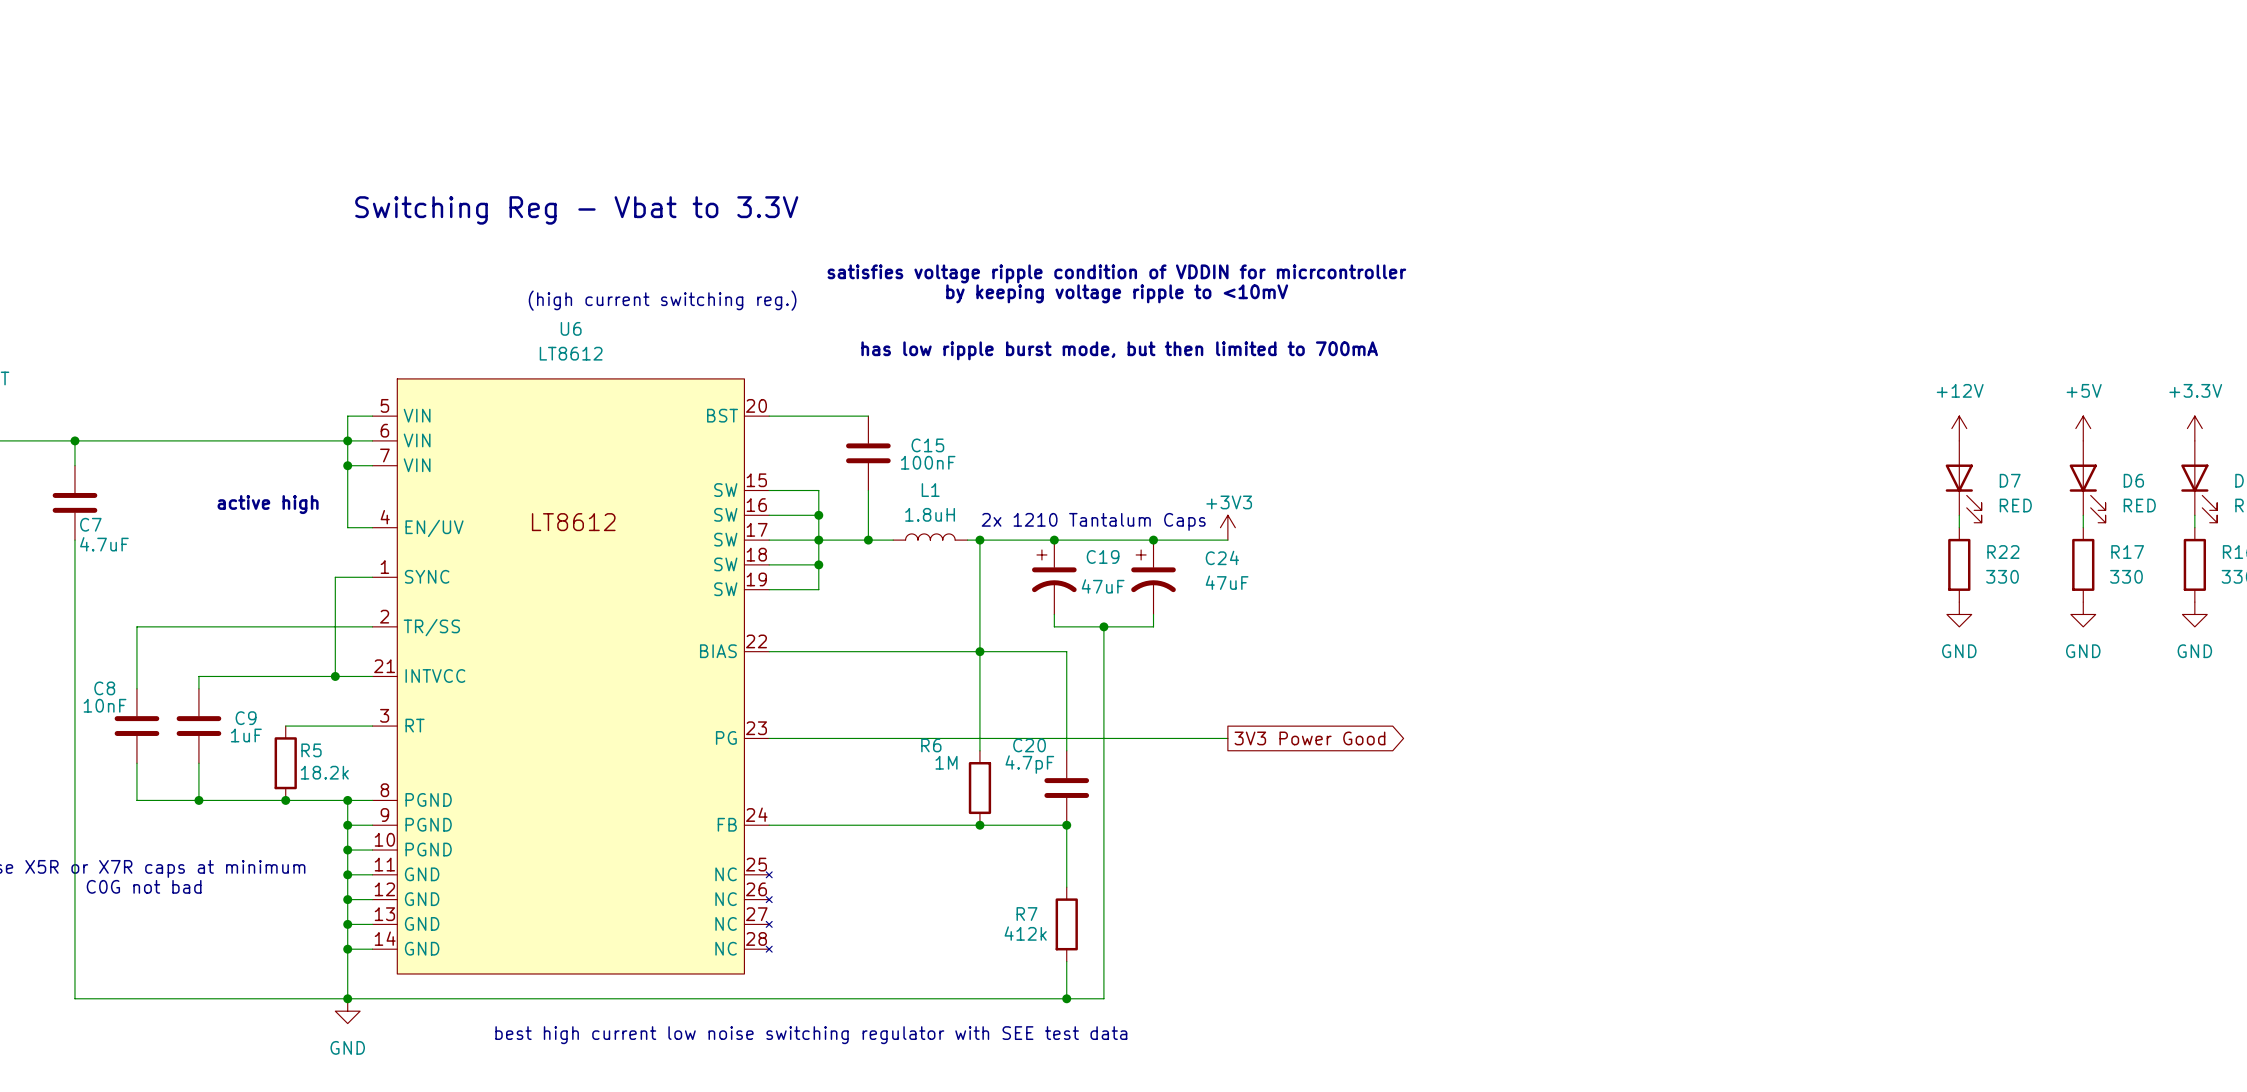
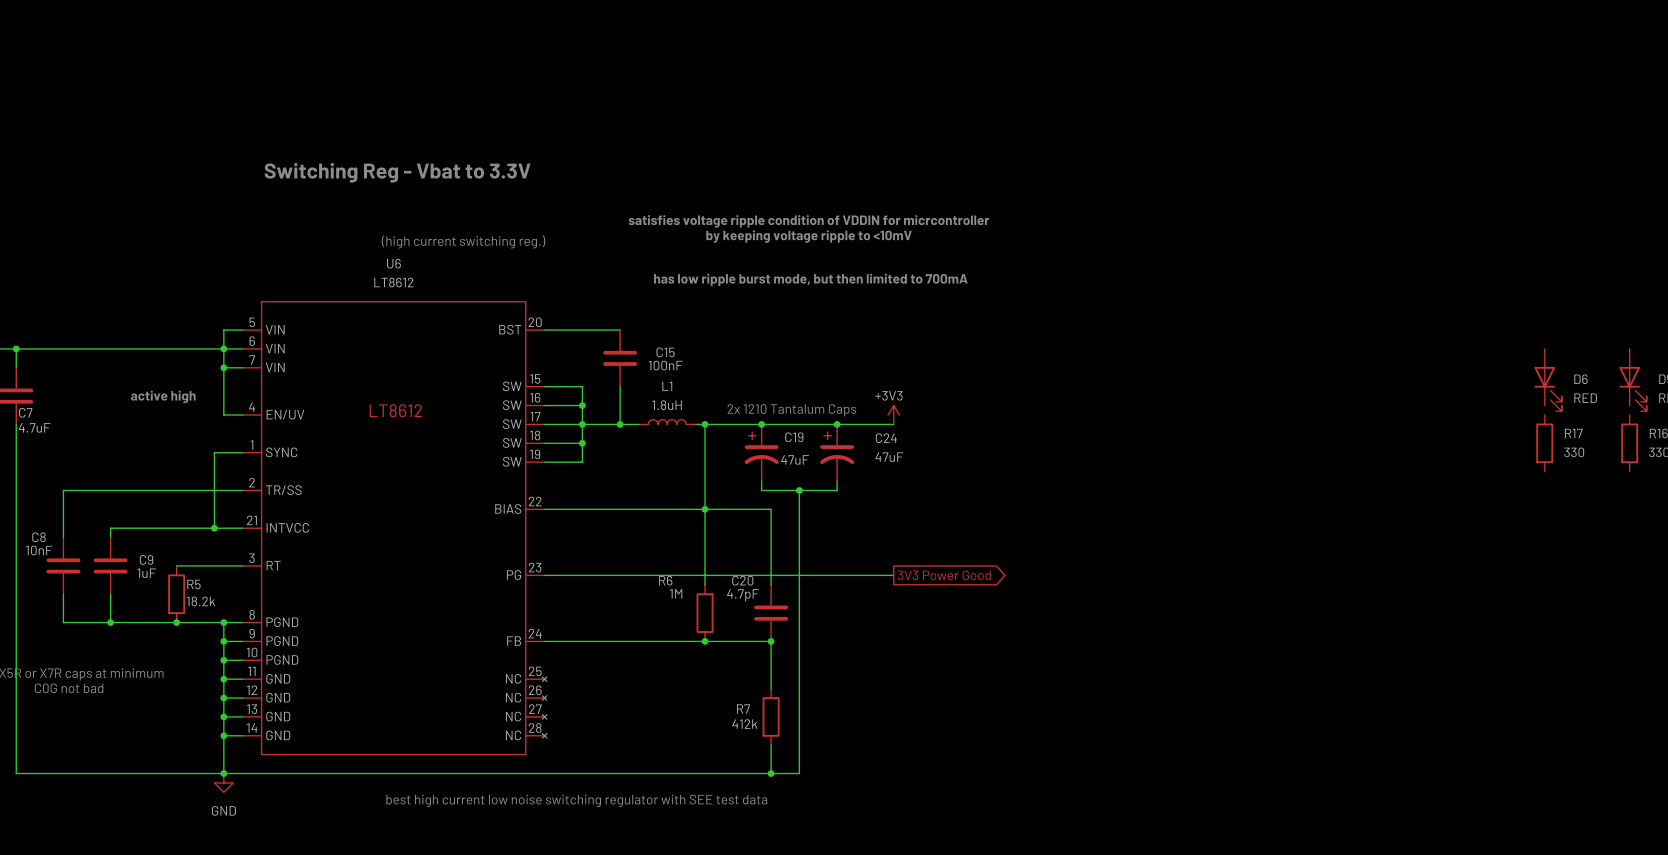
power symbol: +12V (1959, 428) -> none
power symbol: +5V (2083, 428) -> none
power symbol: +3.3V (2194, 428) -> none
D7: RED (1963, 481) -> none
wire: (1959, 515) (1959, 527) -> none
wire: (2083, 515) (2083, 527) -> none
wire: (2194, 515) (2194, 527) -> none
R22: 330 (1959, 564) -> none
power symbol: GND (1959, 614) -> none
power symbol: GND (2083, 614) -> none
power symbol: GND (2194, 614) -> none

